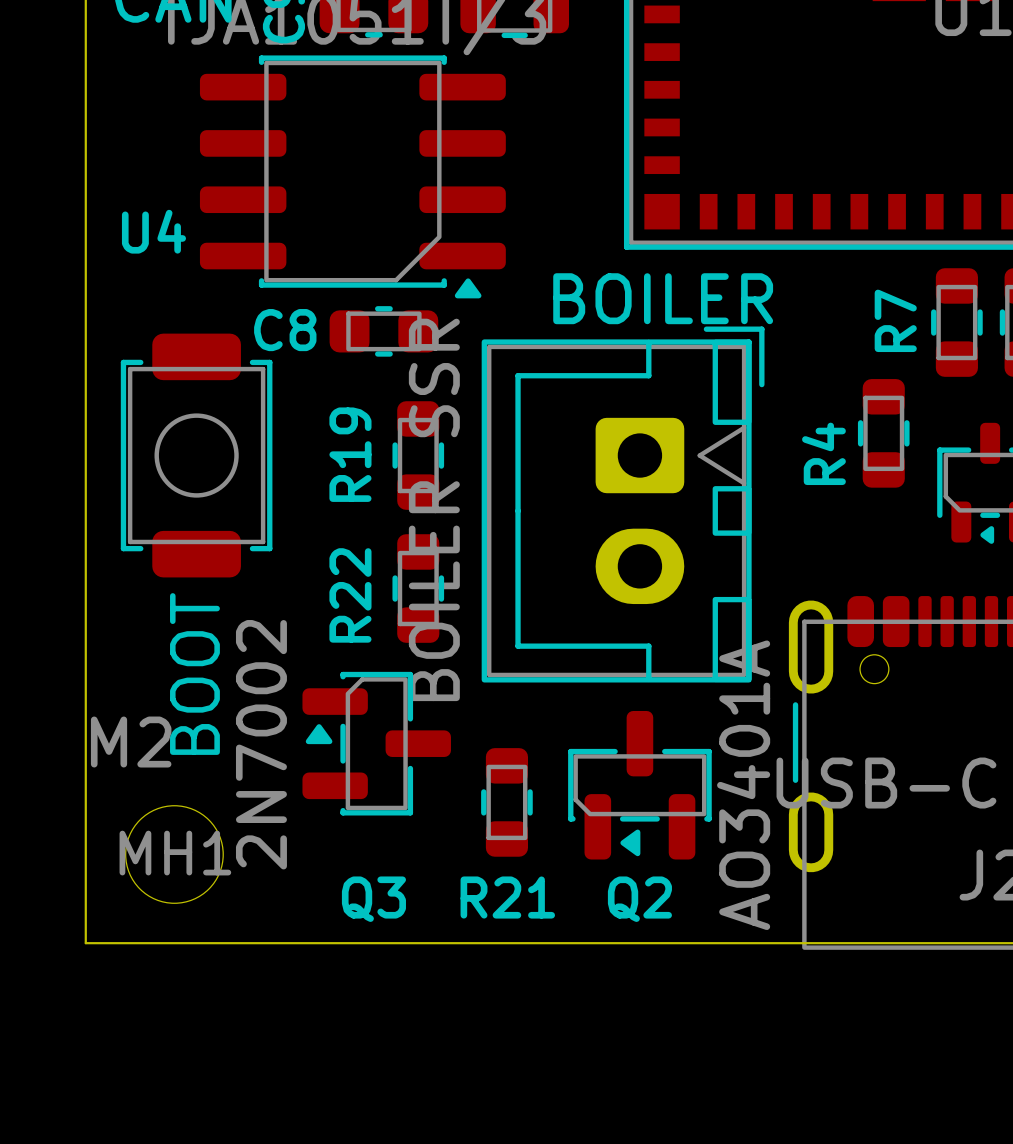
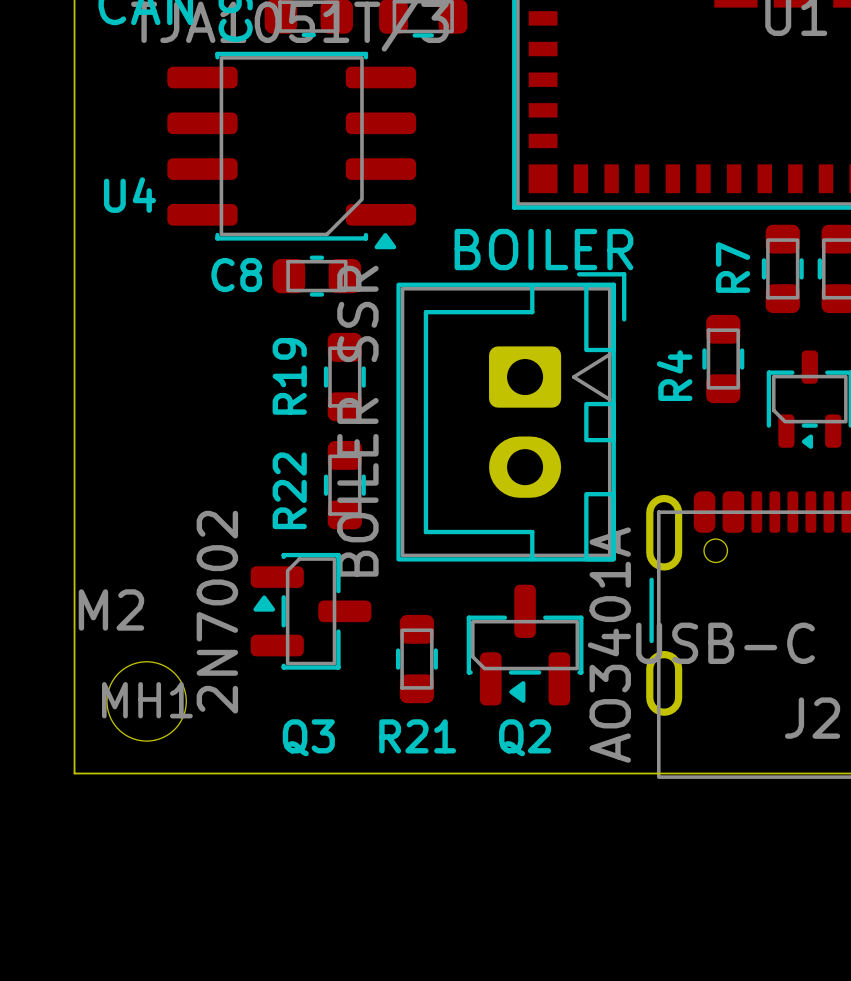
BOOT: (196, 455) -> none

